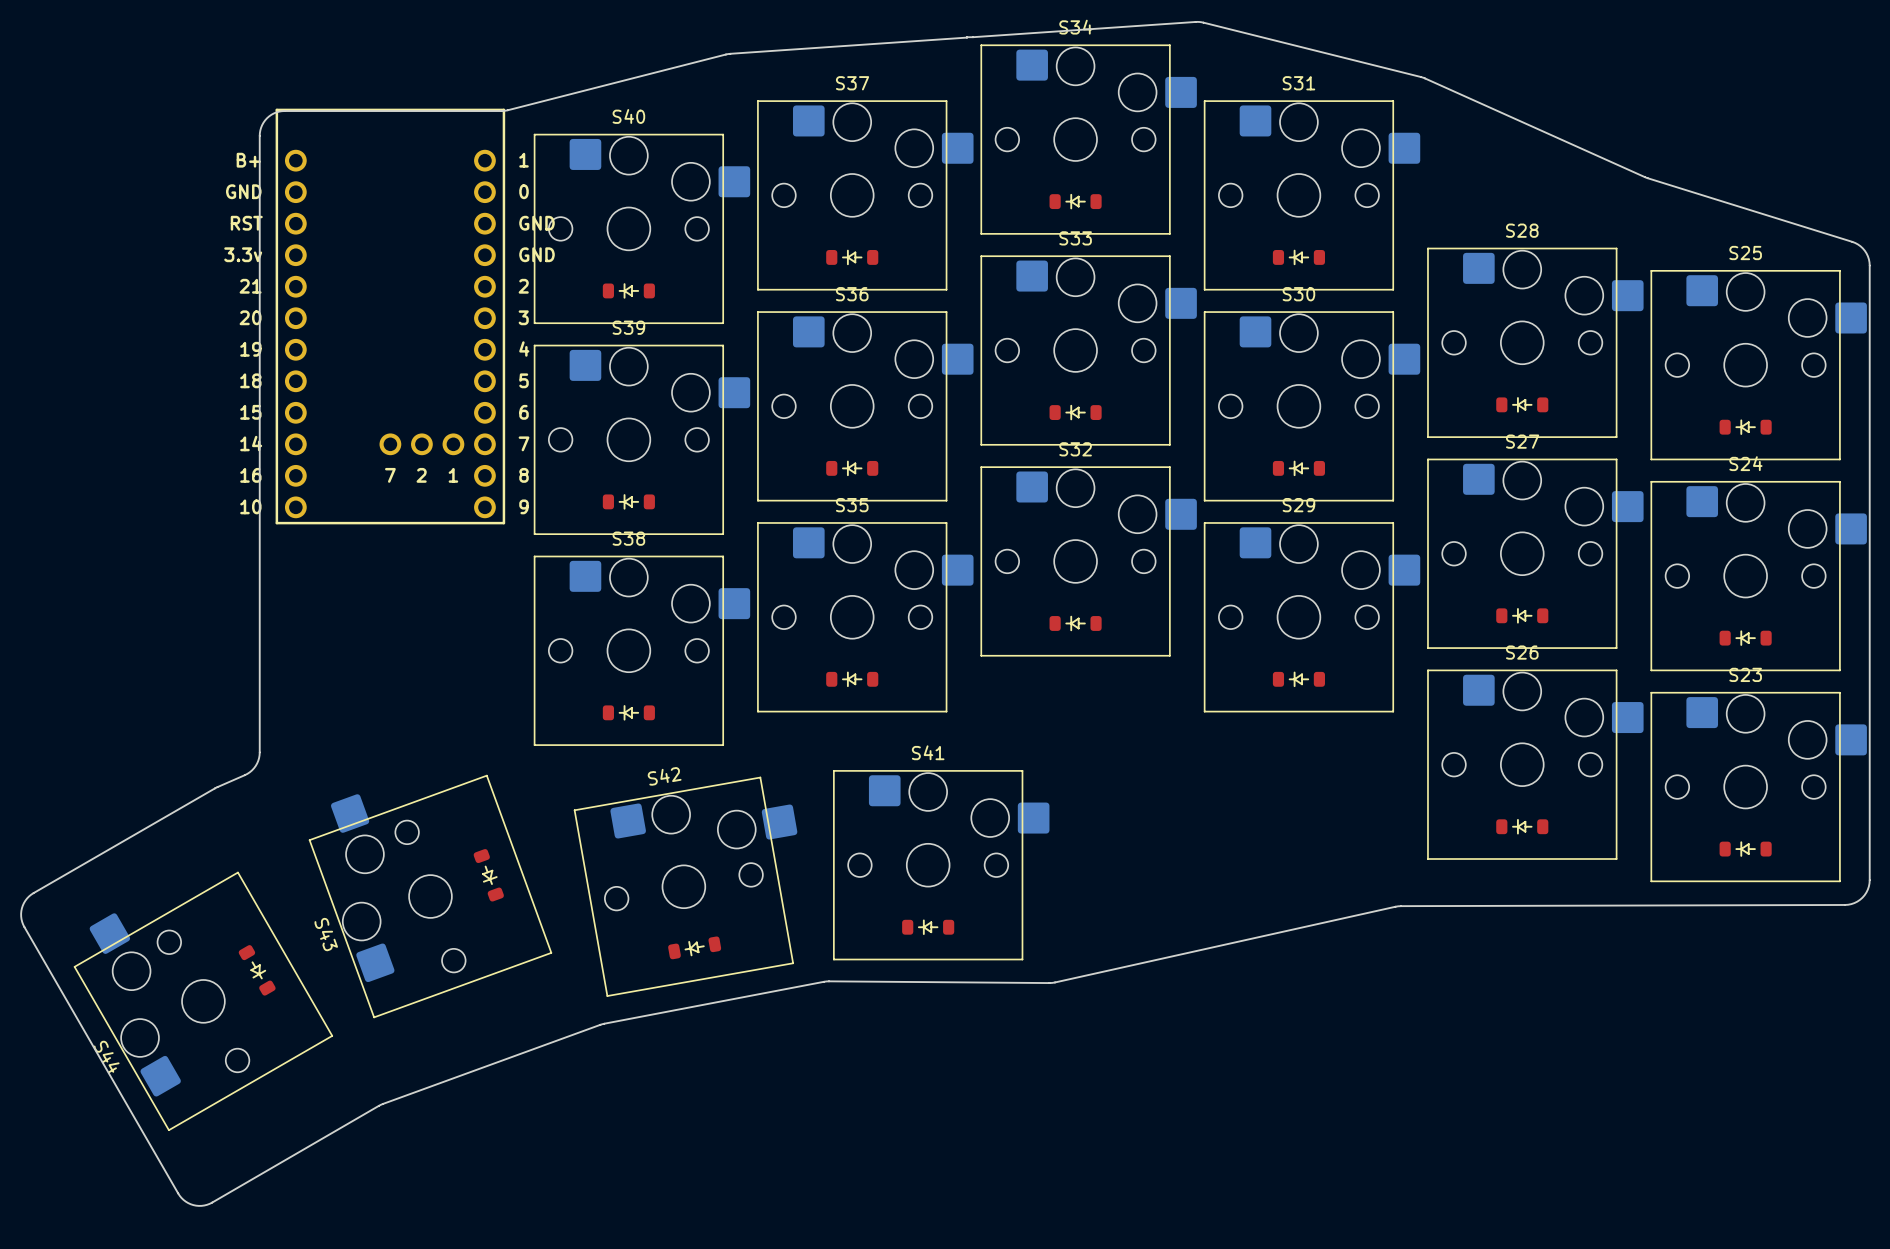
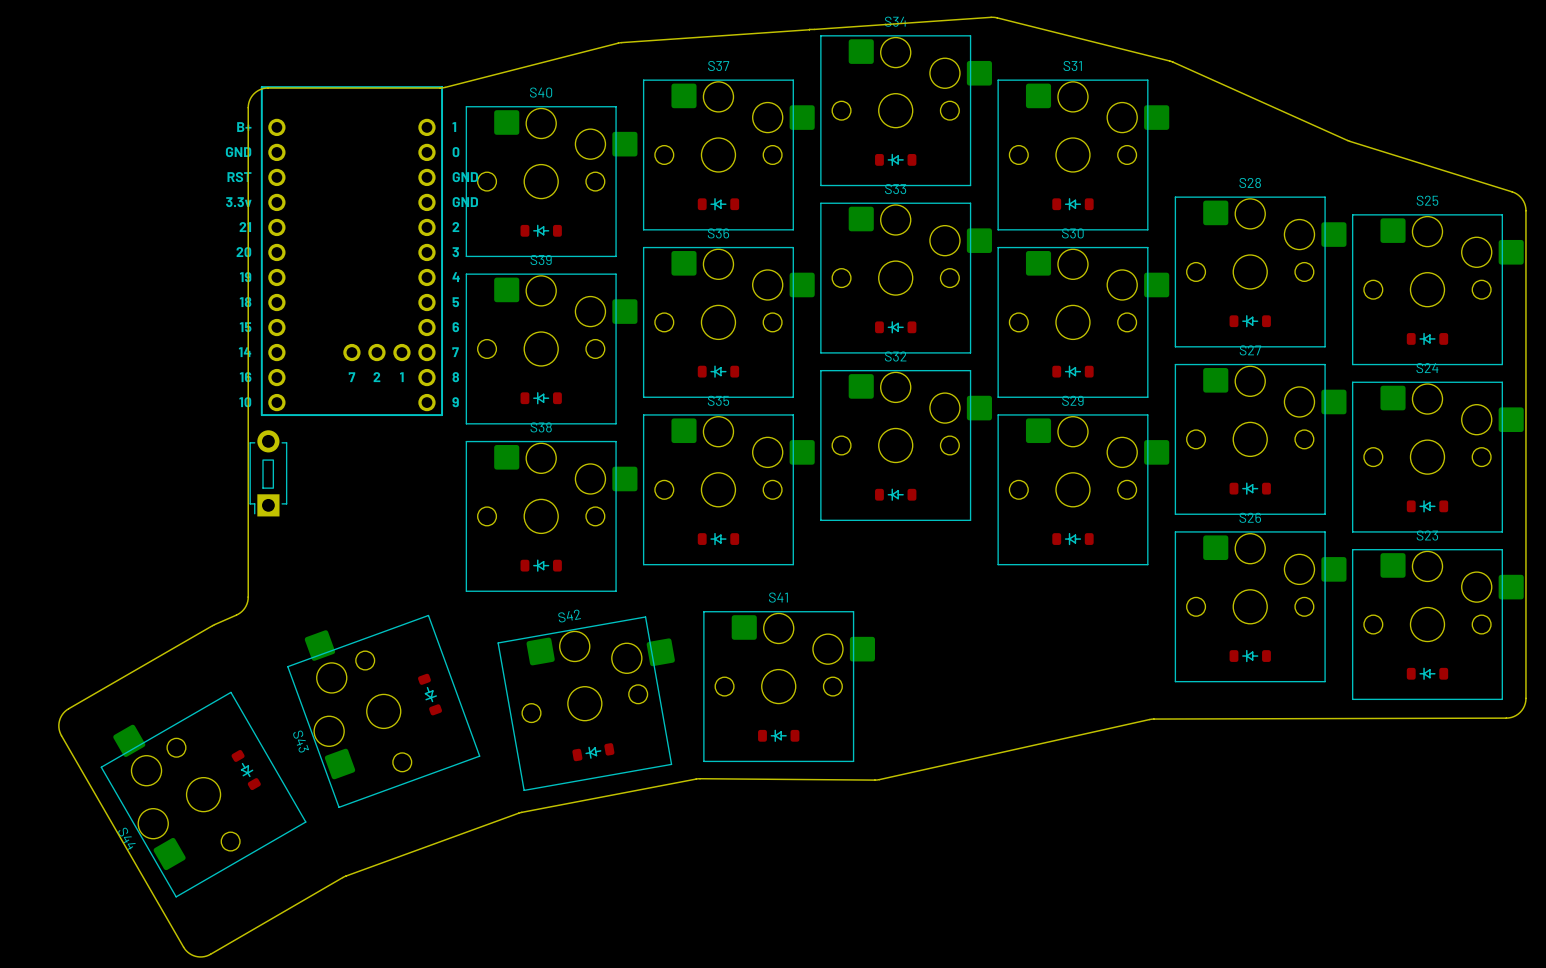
part: none -> (268, 473)

